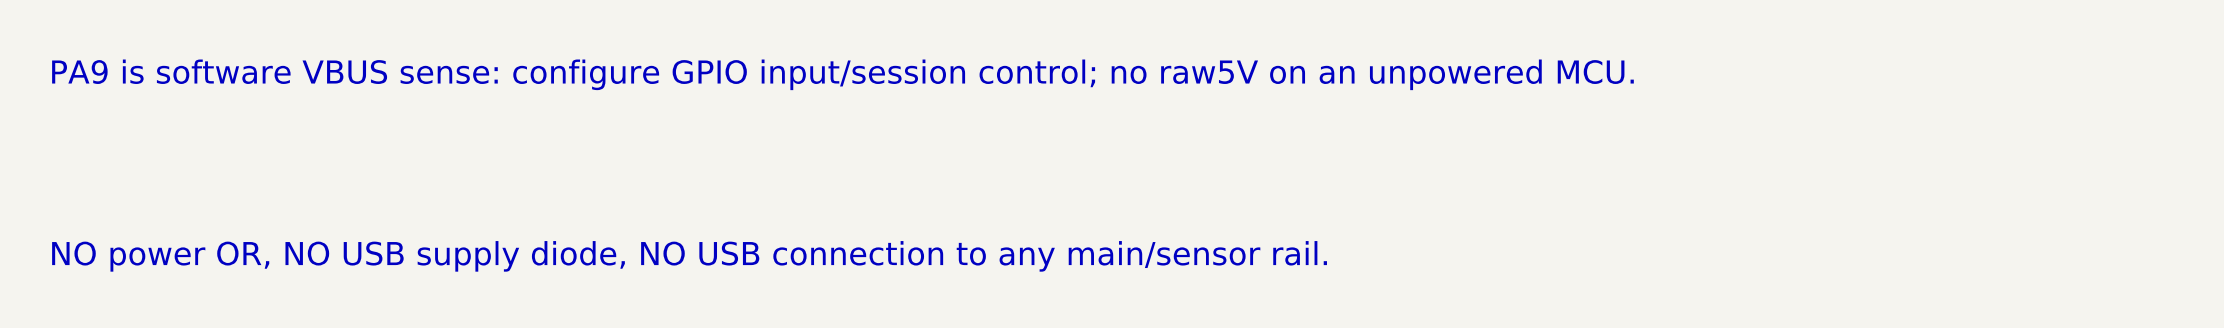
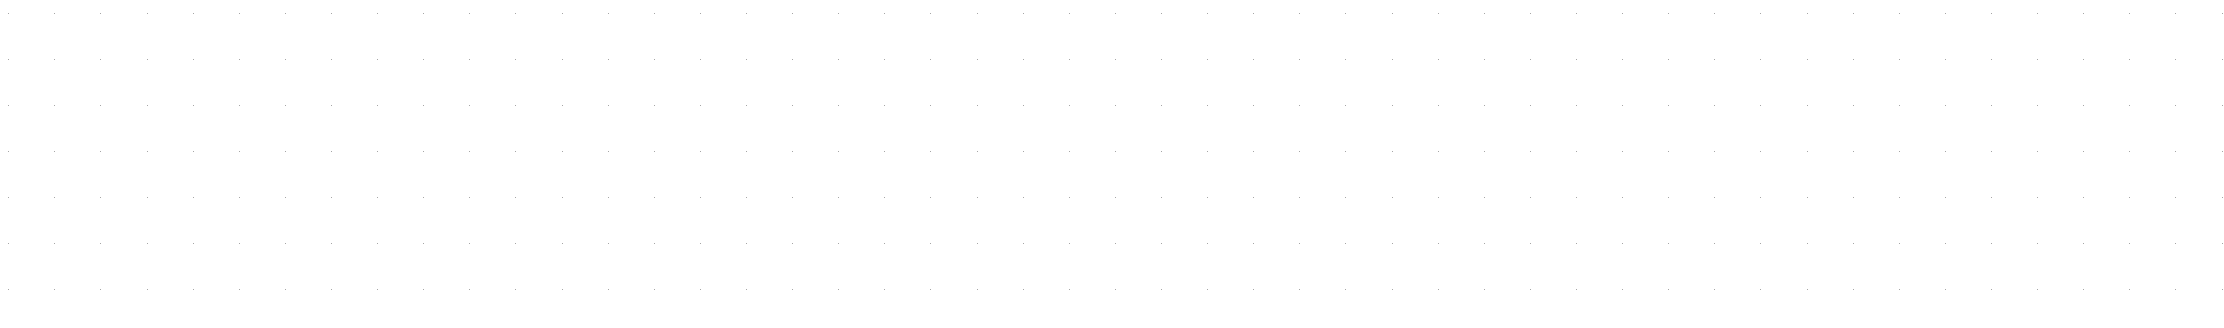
text: PA9 is software VBUS sense: configure GPIO input/session control; no raw5V on an unpowered MCU. (842, 74) -> none
text: NO power OR, NO USB supply diode, NO USB connection to any main/sensor rail. (689, 256) -> none

